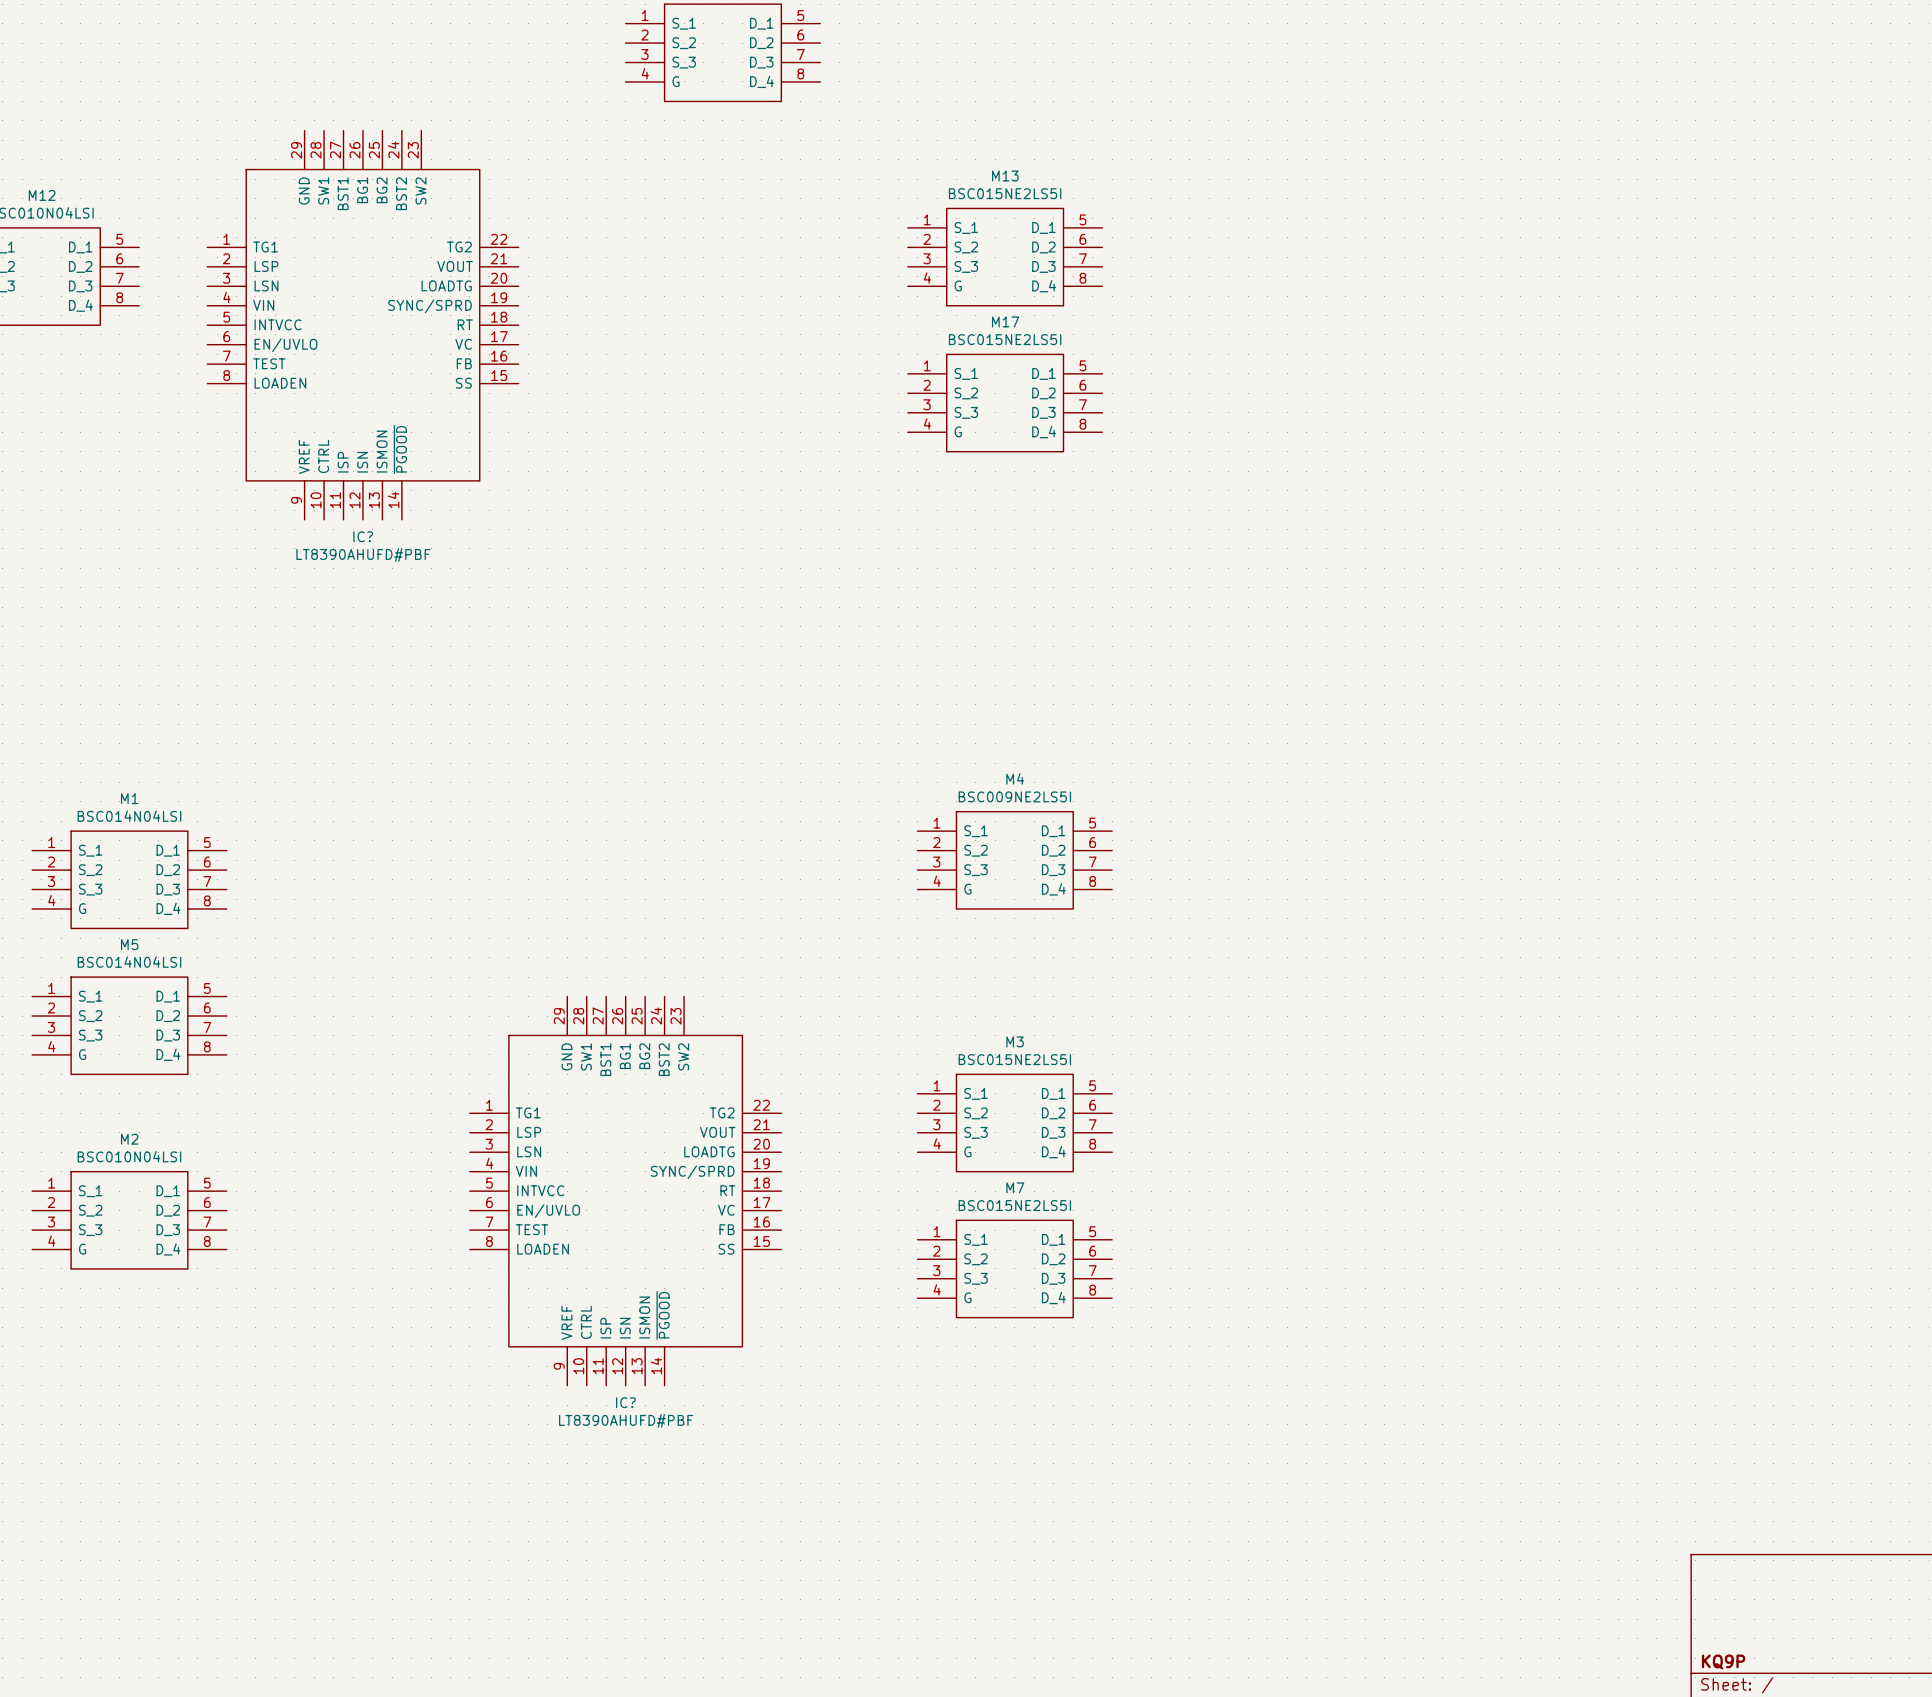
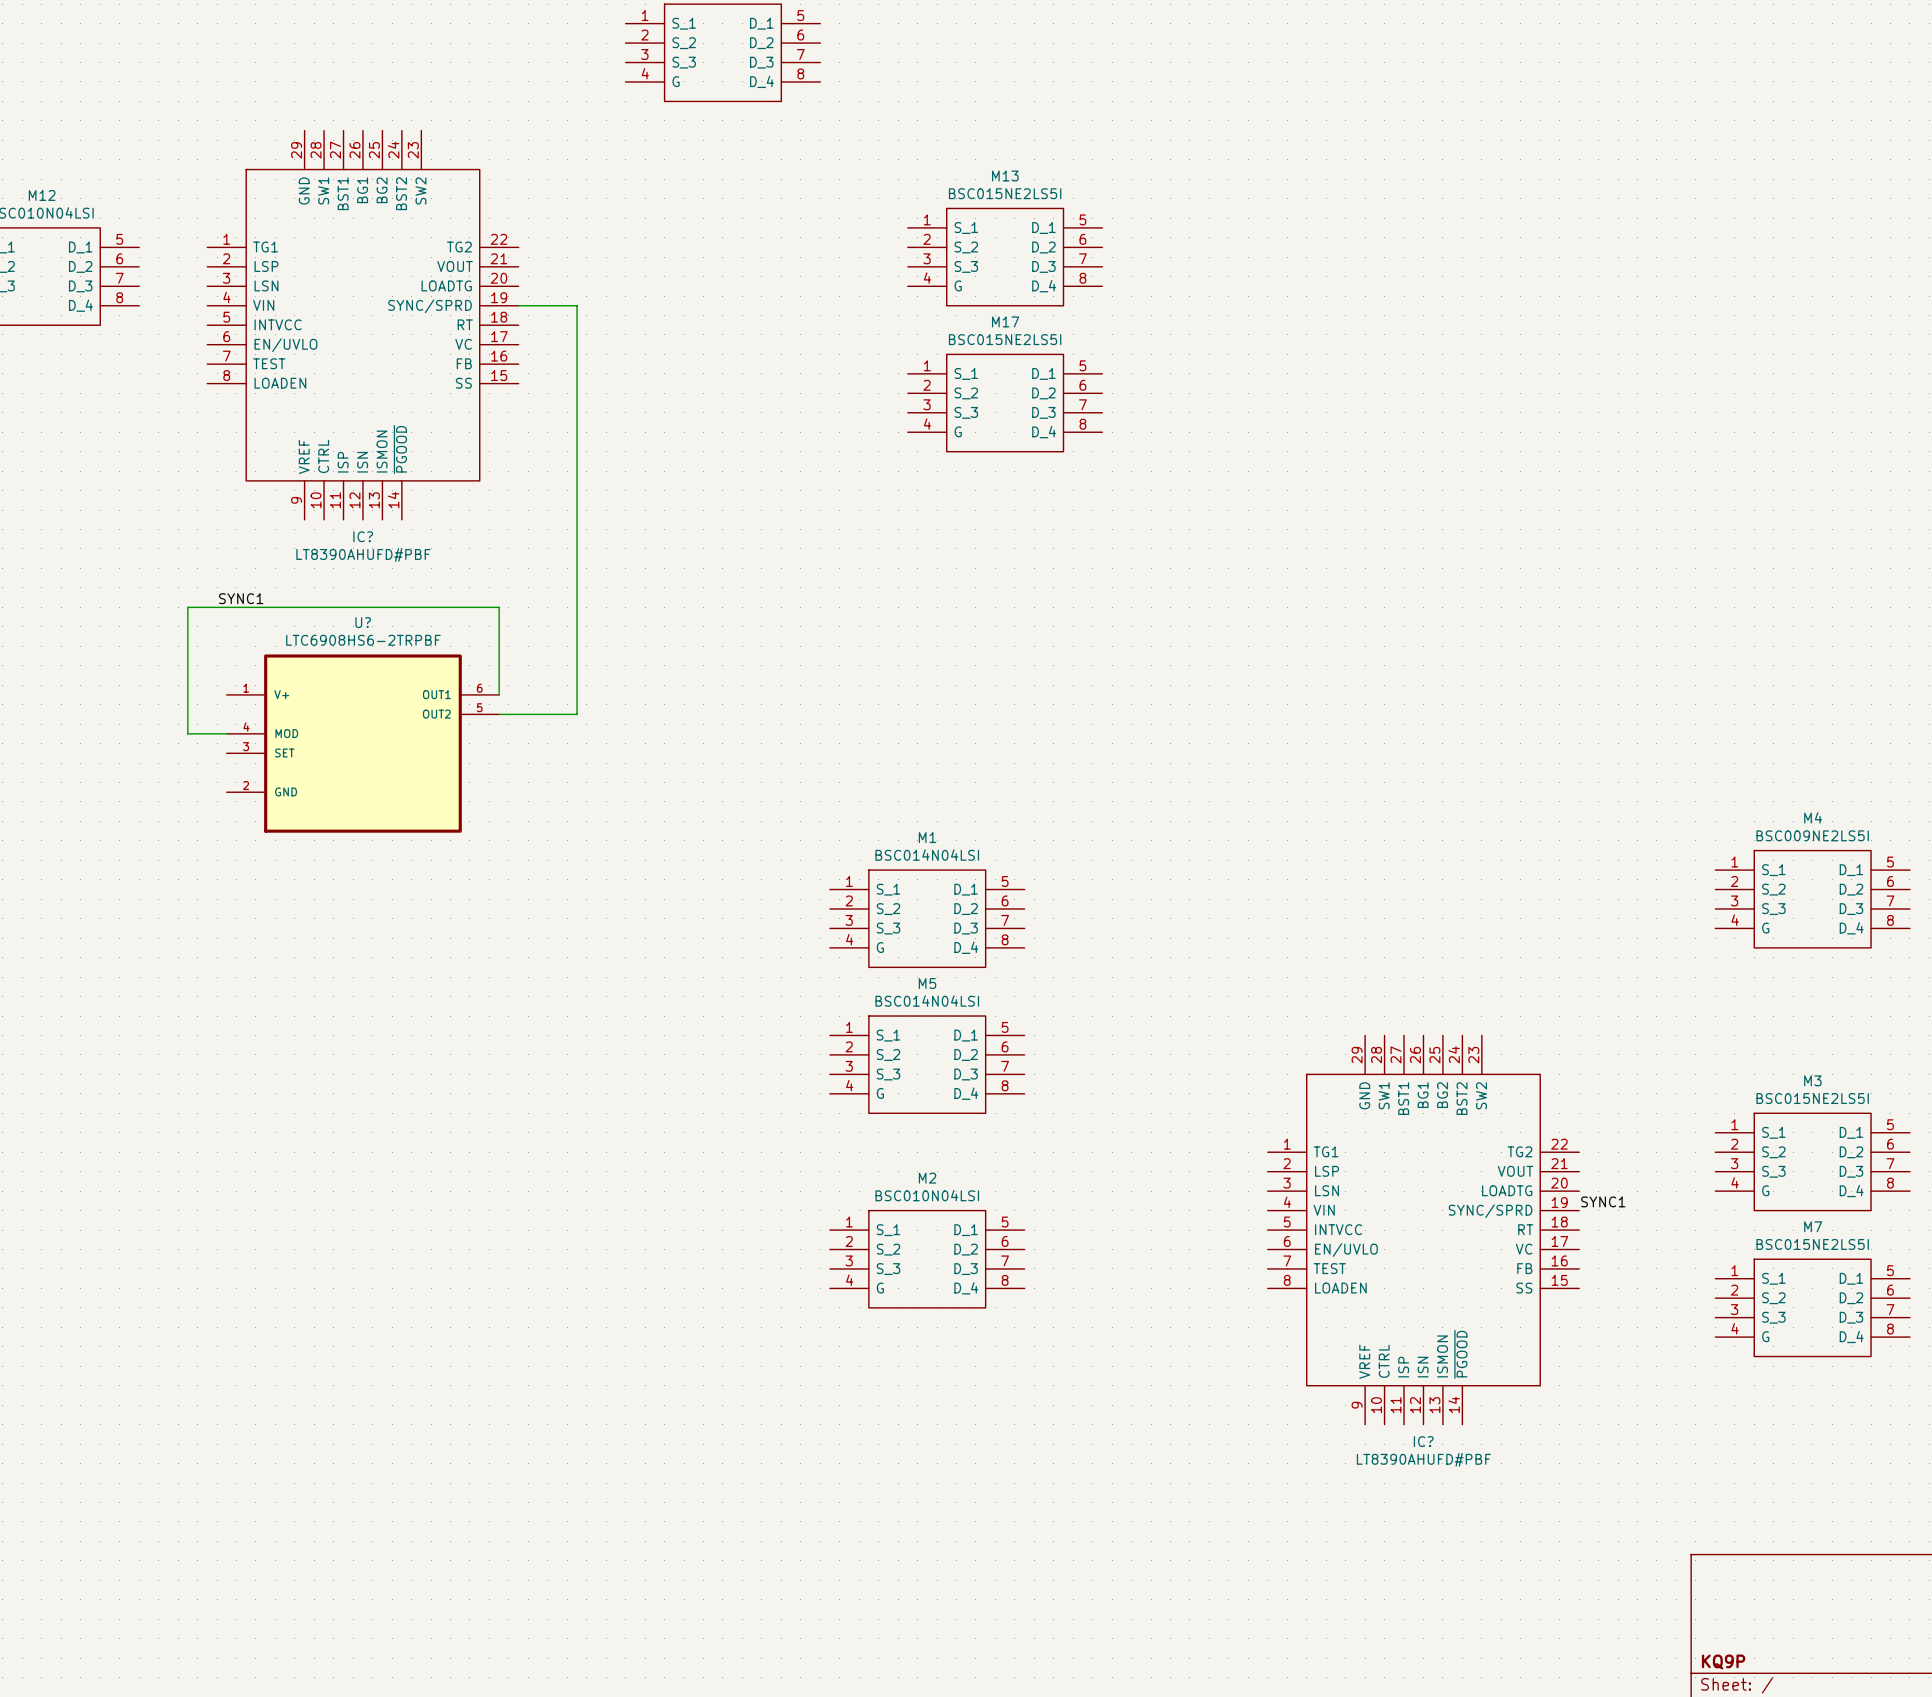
wire: none -> (518, 305) (577, 305) (577, 714) (499, 714)
label: none -> SYNC1 (241, 598)
wire: none -> (499, 694) (499, 607) (187, 607) (187, 733) (226, 733)
U?: none -> LTC6908HS6-2TRPBF (362, 743)
M4 position: (1014, 860) -> (1812, 899)
M1 position: (129, 879) -> (927, 918)
M5 position: (129, 1025) -> (927, 1064)
M3 position: (1014, 1123) -> (1812, 1161)
IC?: LT8390AHUFD#PBF (625, 1191) -> none
label: none -> SYNC1 (1603, 1201)
M2 position: (129, 1220) -> (927, 1259)
IC?: none -> LT8390AHUFD#PBF (1423, 1230)
M7 position: (1014, 1268) -> (1812, 1307)

